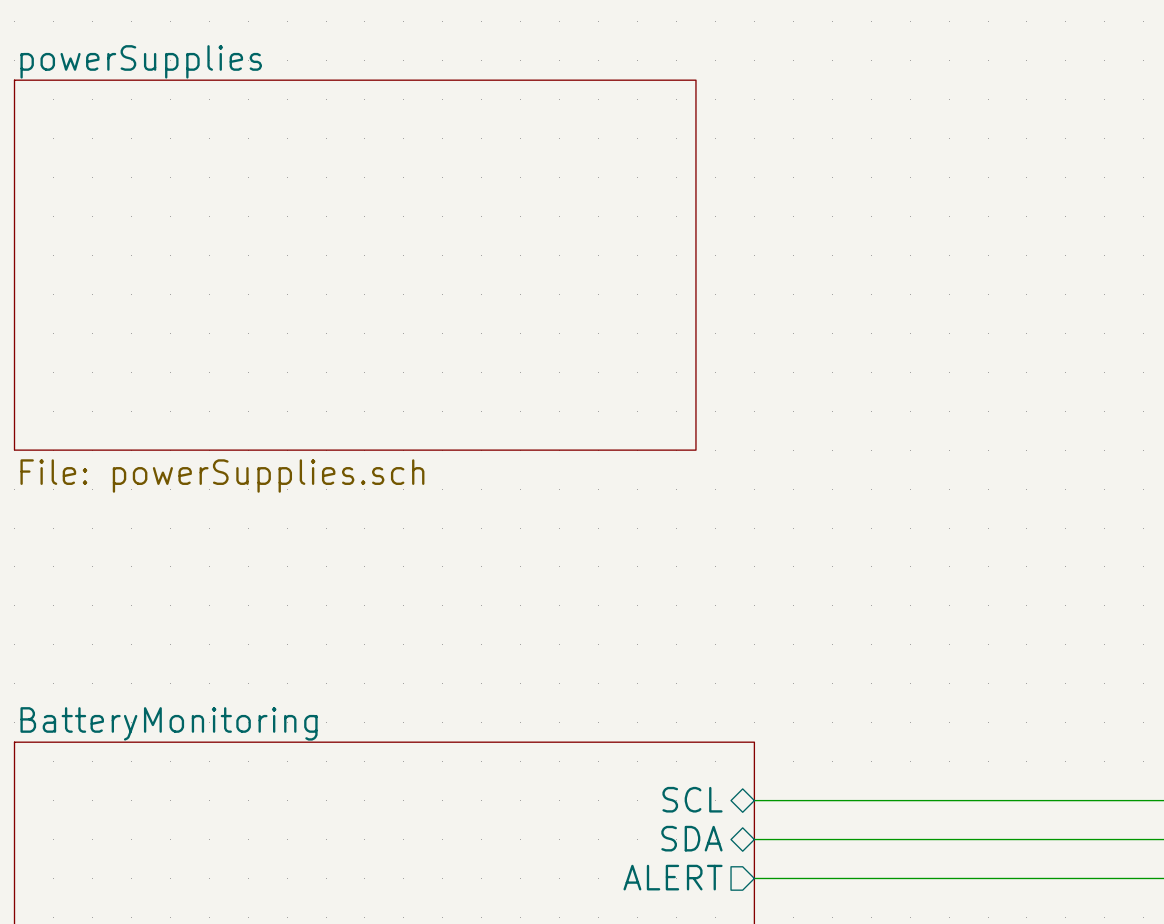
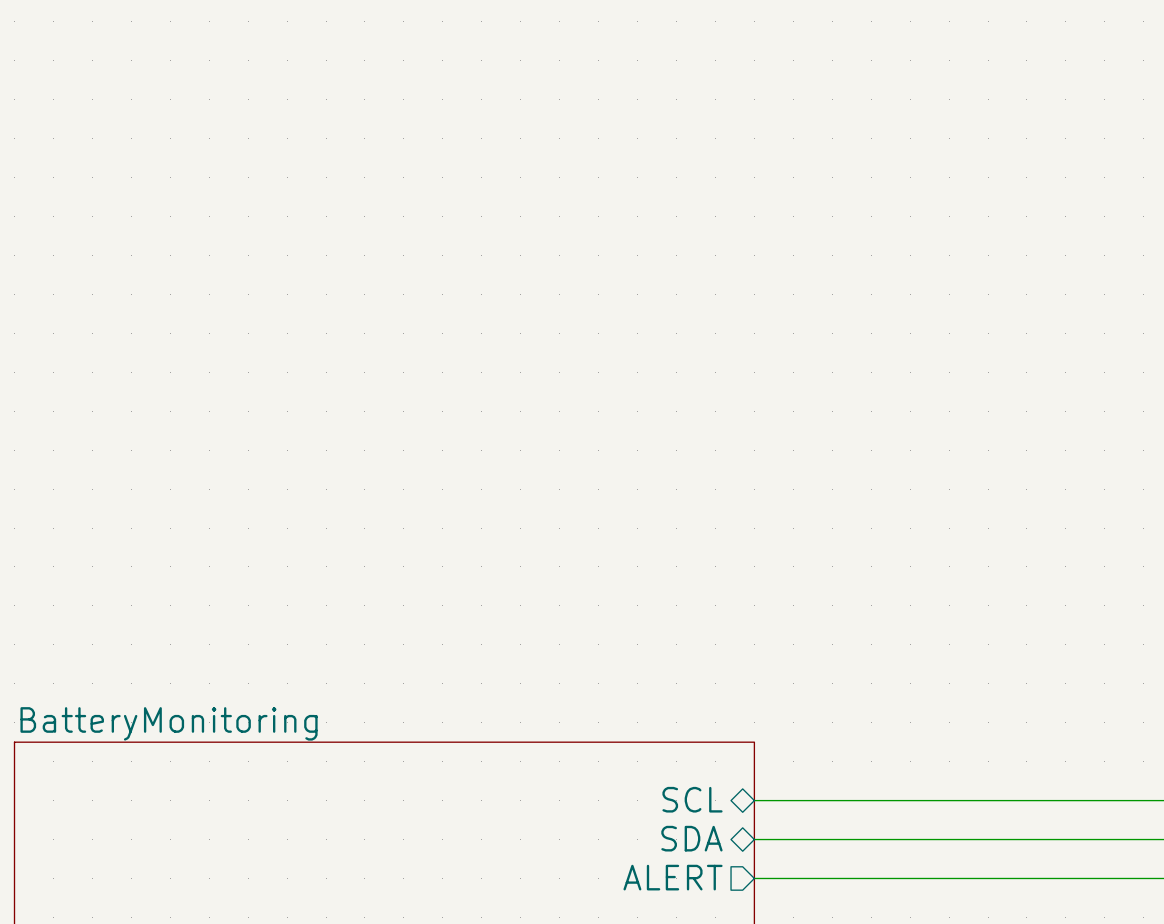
sheet powerSupplies: File: powerSupplies.sch (355, 265) -> none

